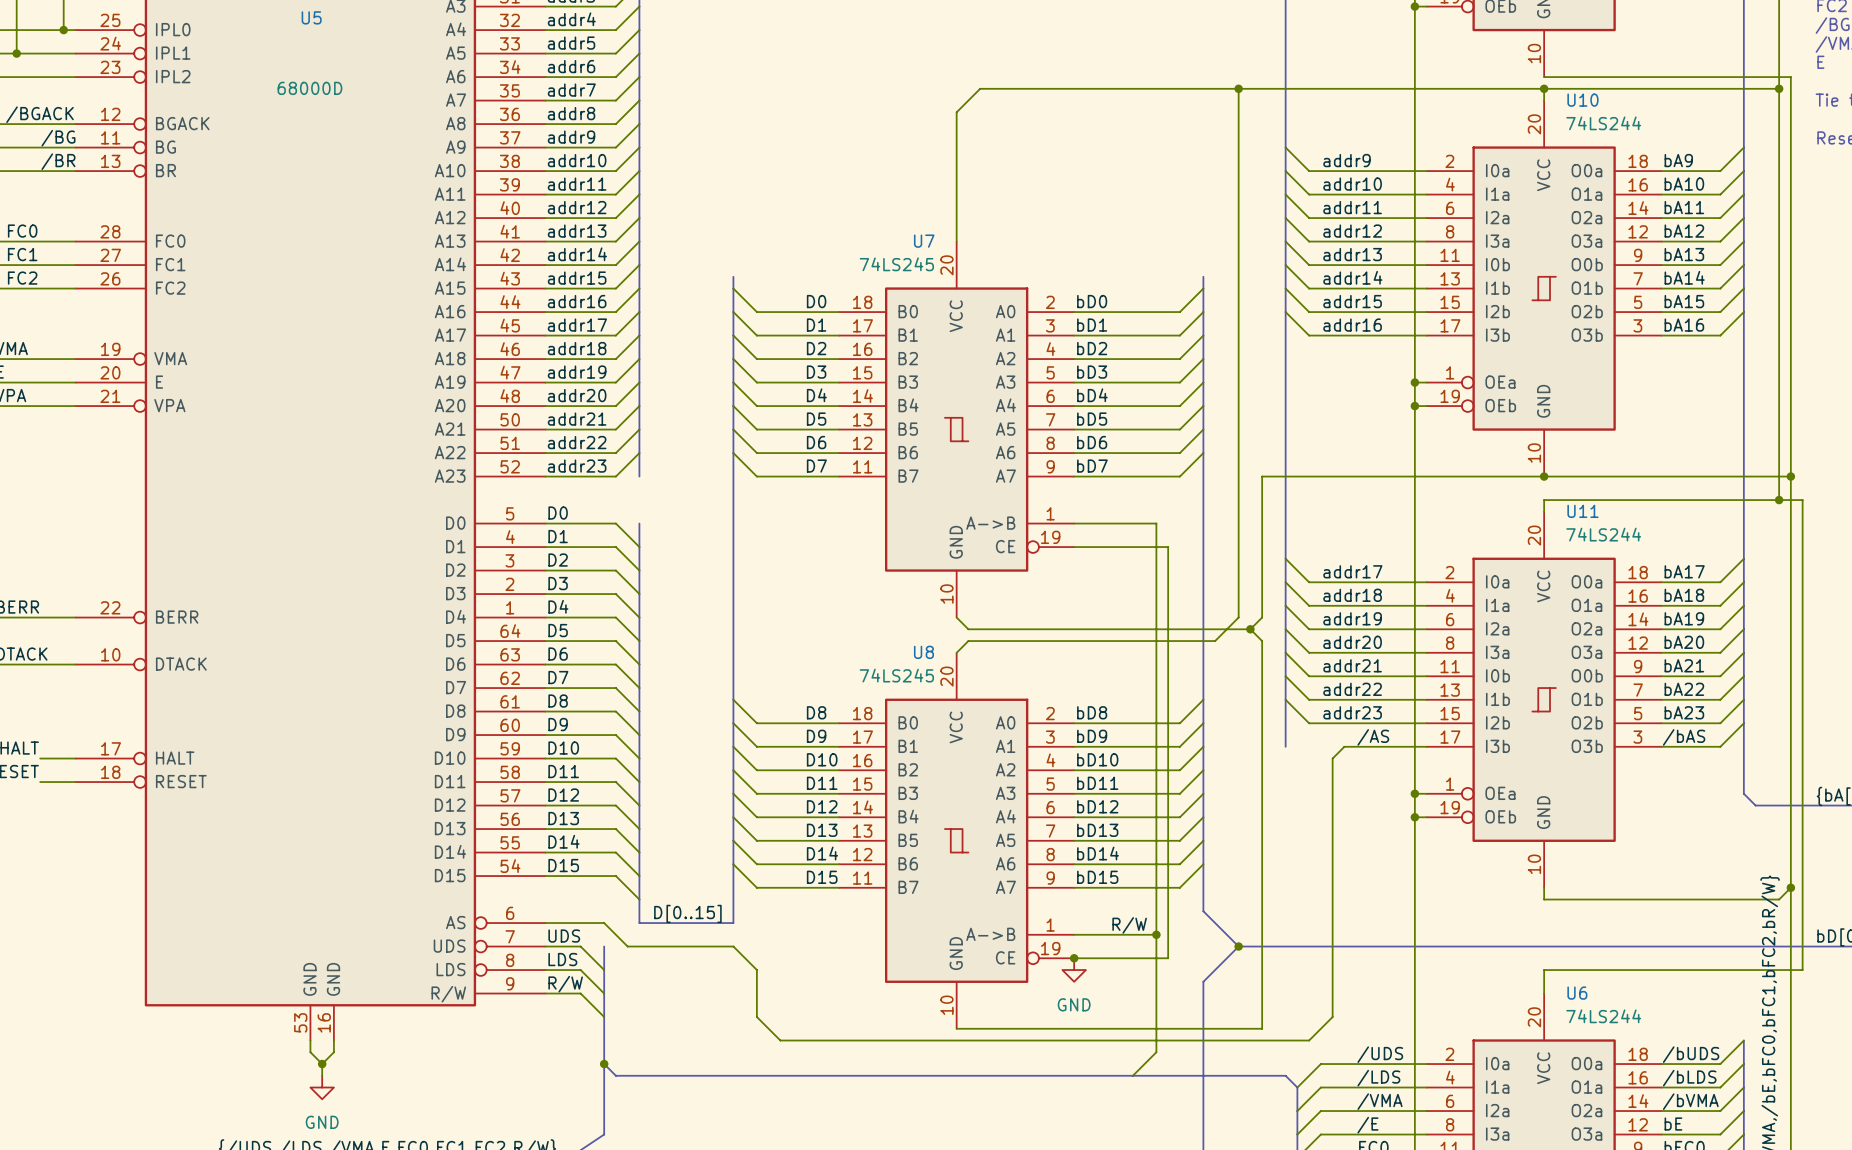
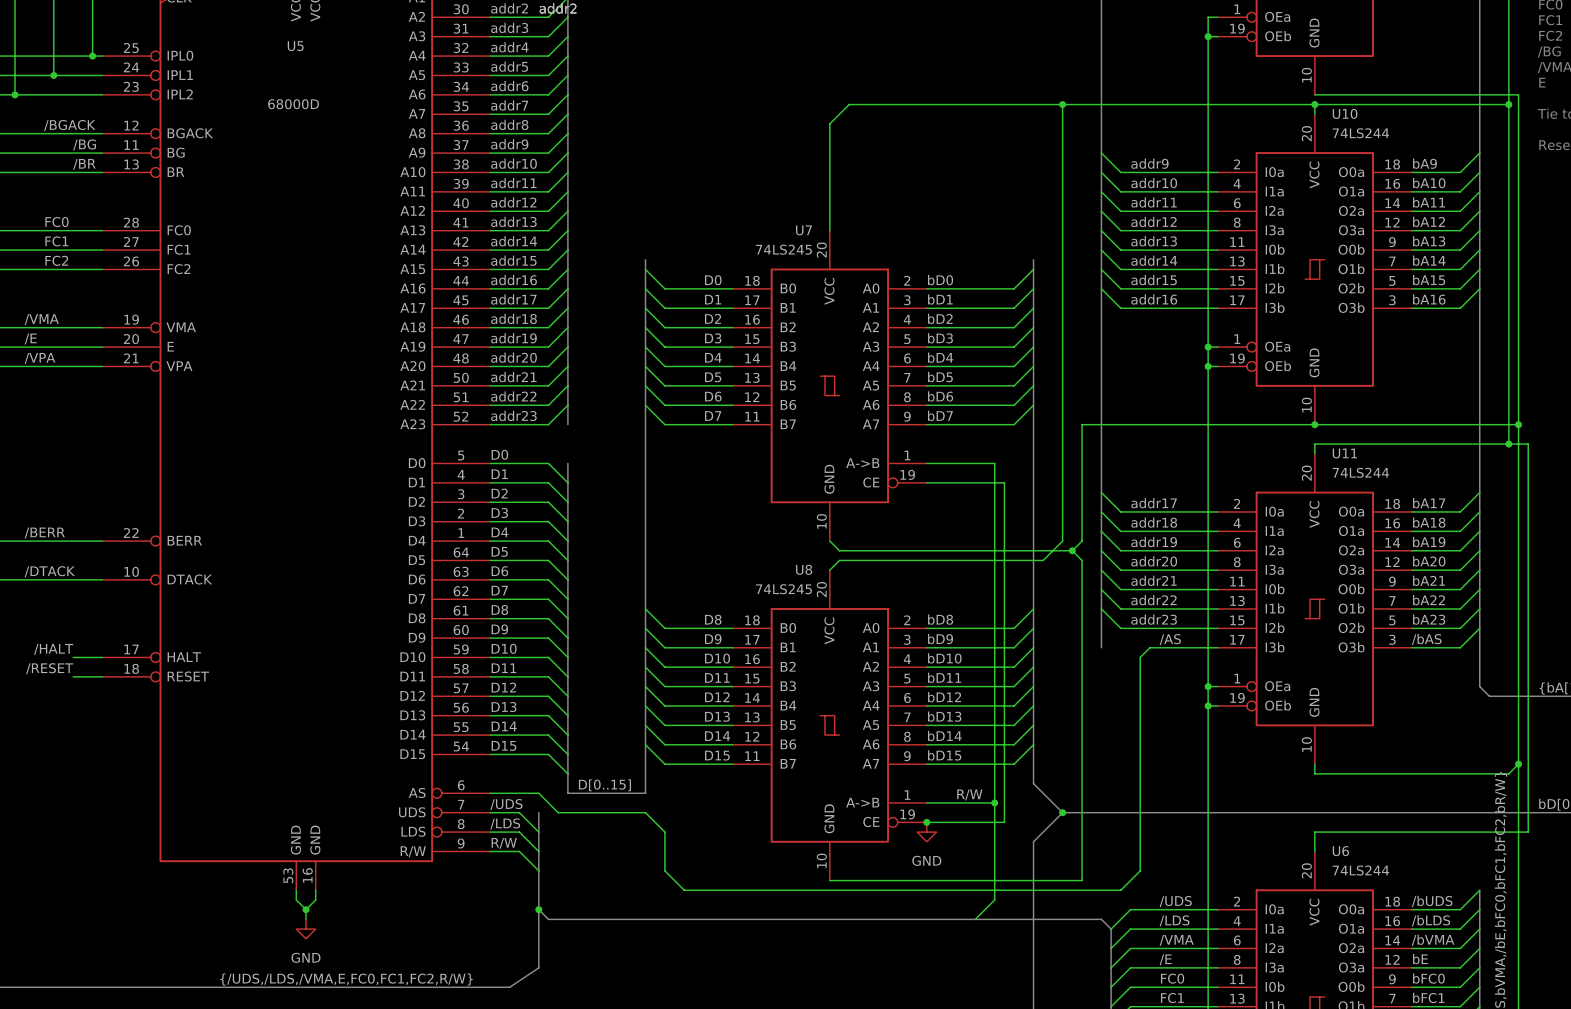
label: UDS (564, 936) -> /UDS (506, 804)
label: LDS (562, 959) -> /LDS (505, 823)

